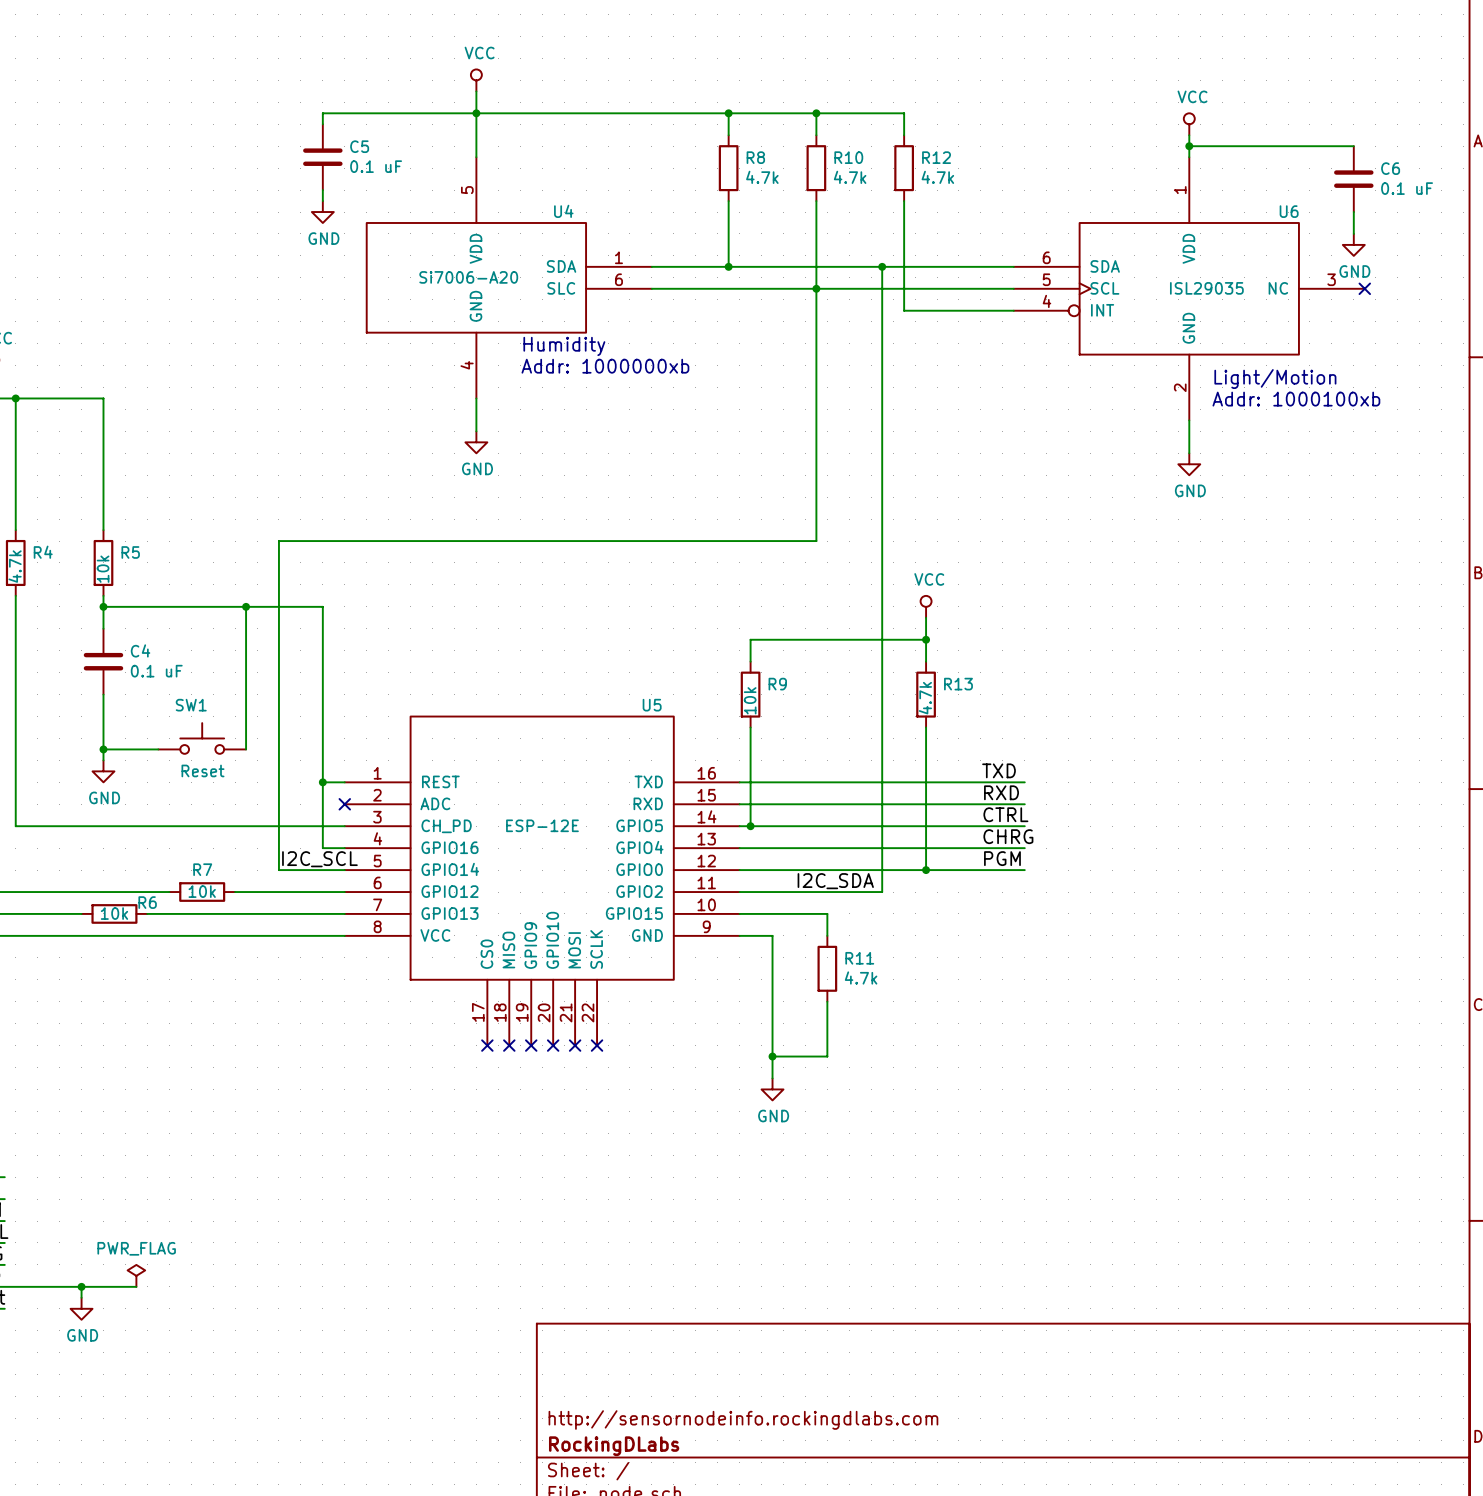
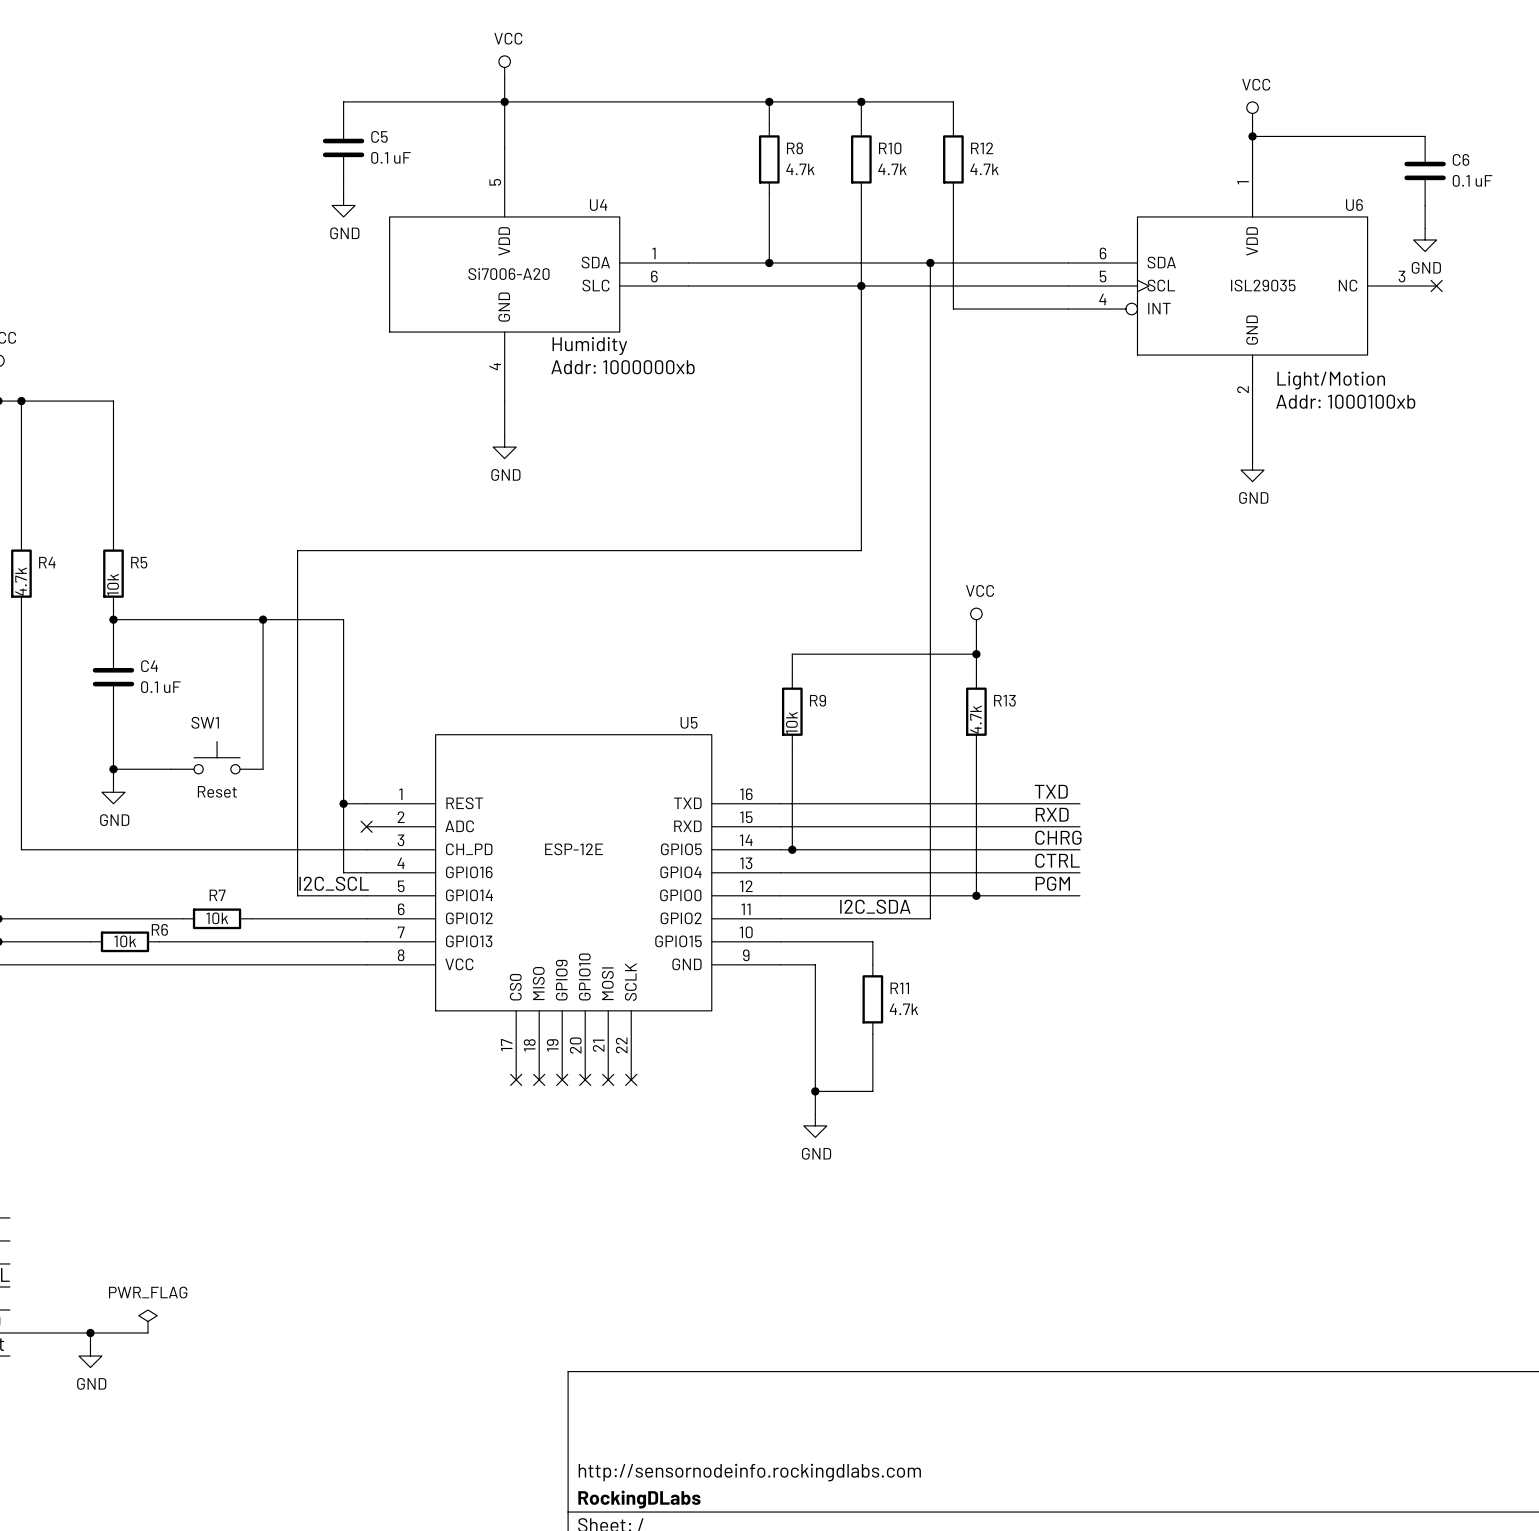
label: CTRL (1005, 814) -> CHRG (1058, 837)
label: CHRG (1008, 836) -> CTRL (1057, 860)

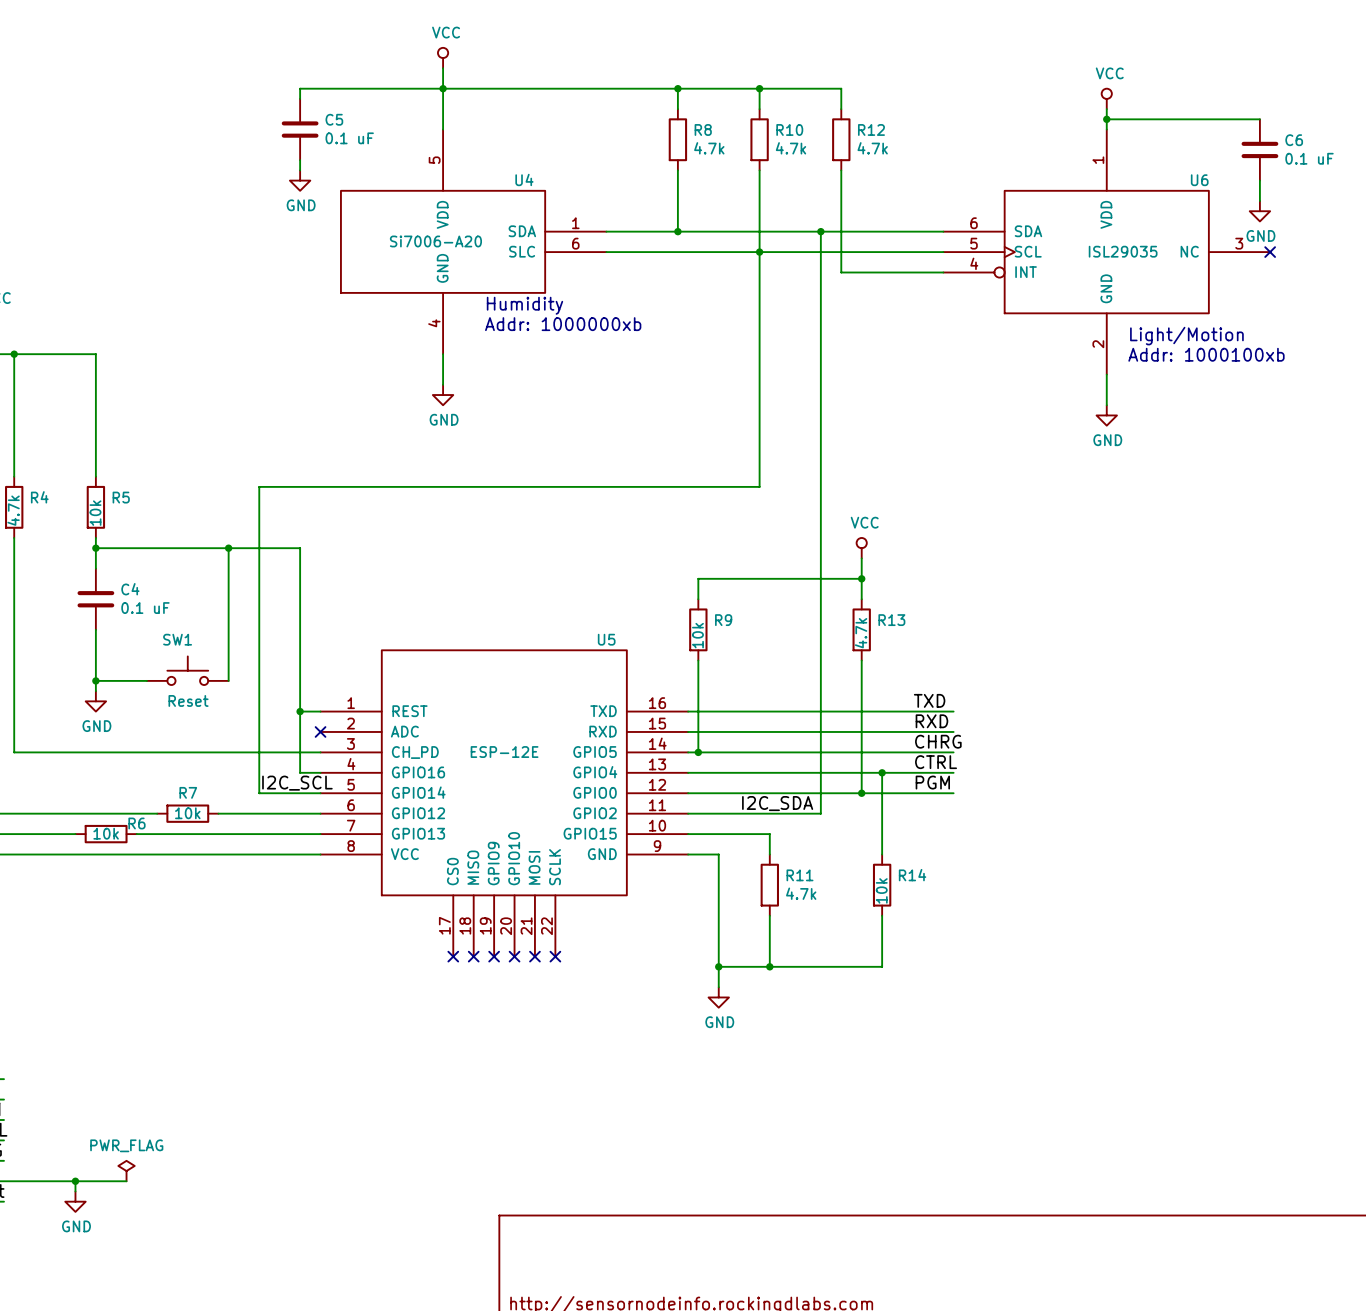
wire: none -> (882, 772) (882, 854)
junction: none -> (882, 772)
R14: none -> 10k (882, 885)
wire: none -> (882, 915) (882, 966) (769, 966)
junction: none -> (769, 966)

